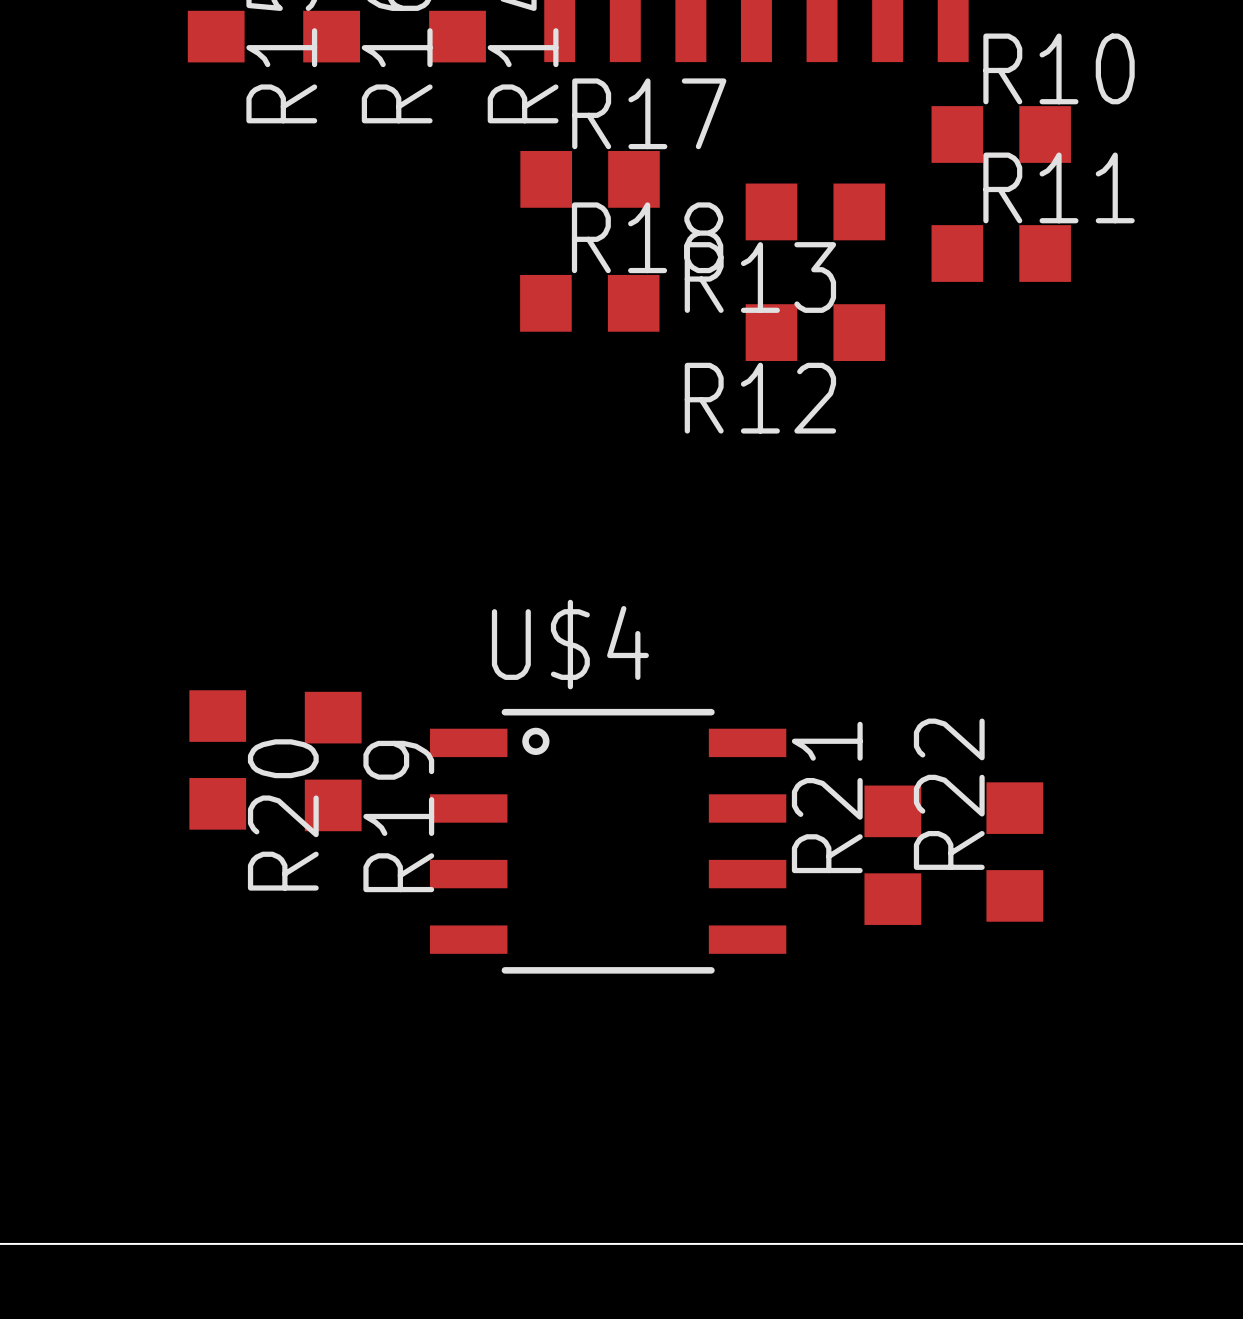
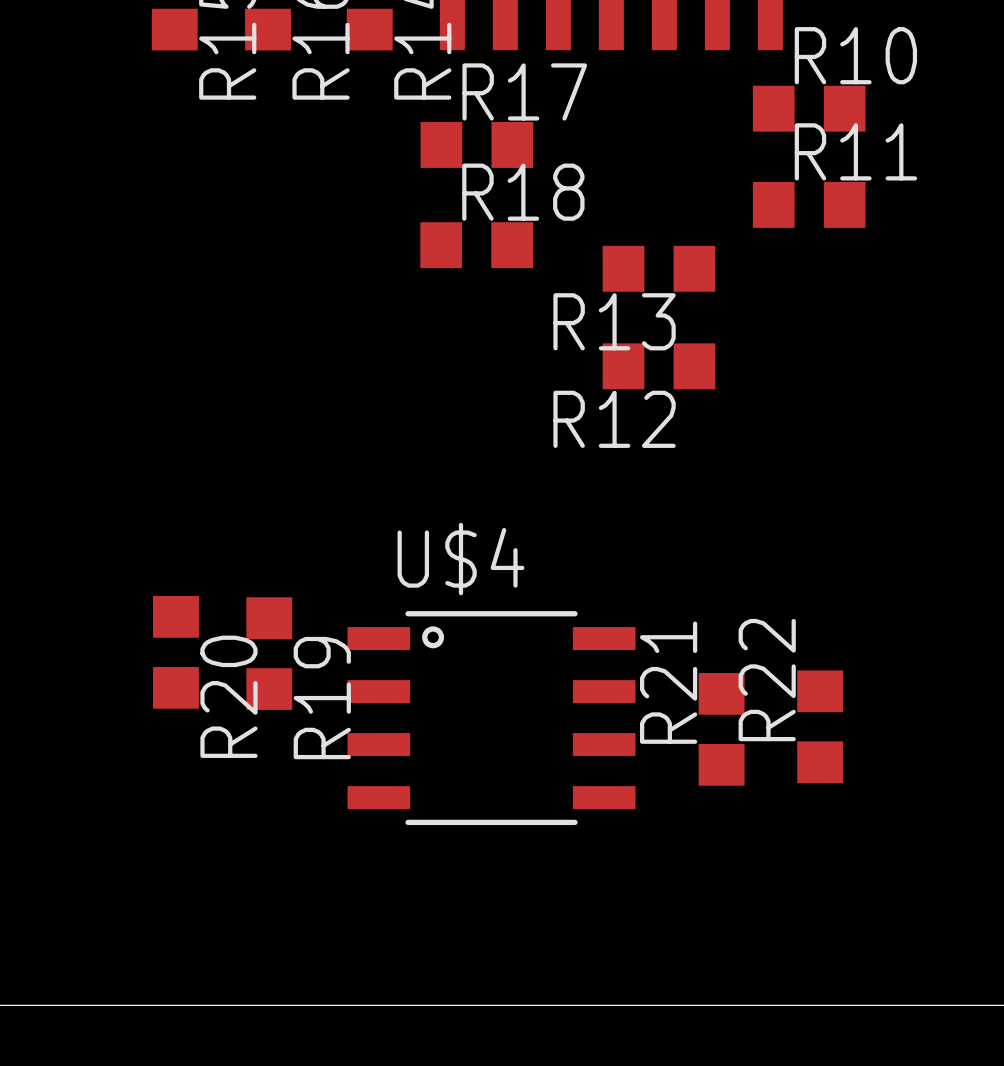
R13: (815, 211) -> none
R12 name: R12 (760, 398) -> R13 (614, 321)
R12: none -> (658, 366)
R20 position: (217, 759) -> (175, 652)
R19 position: (333, 761) -> (269, 653)
U$4 position: (608, 841) -> (491, 718)
R22 position: (1014, 852) -> (820, 726)
R21 position: (892, 855) -> (721, 729)

